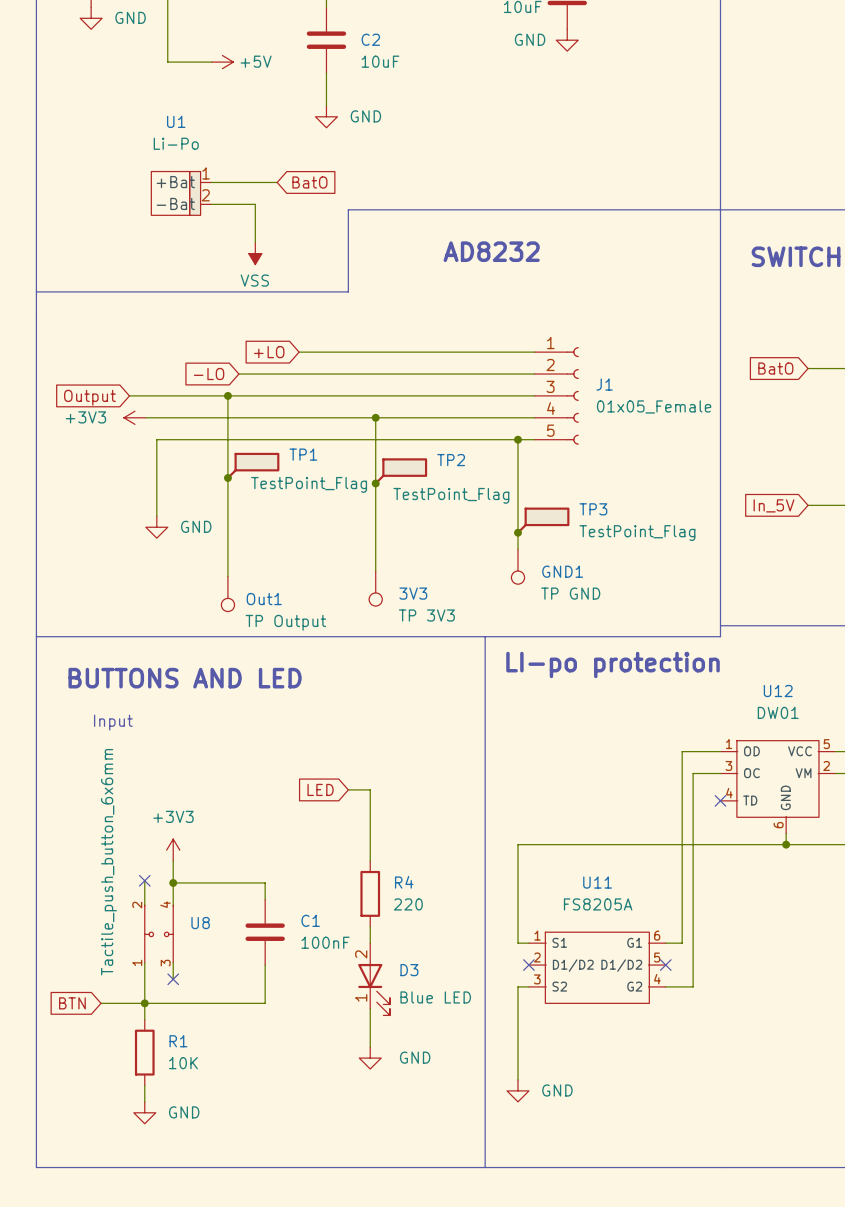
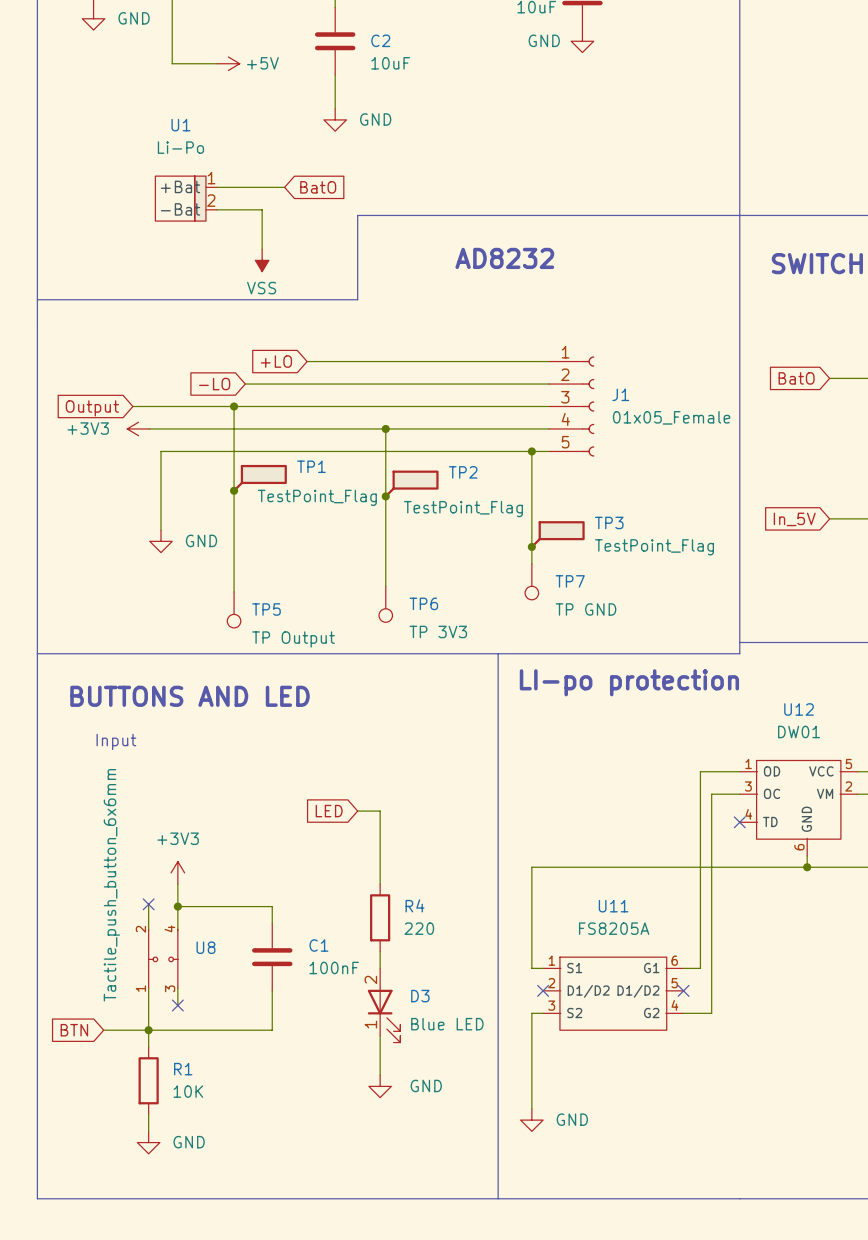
GND1 name: GND1 (562, 571) -> TP7 (570, 581)
3V3 name: 3V3 (413, 593) -> TP6 (423, 603)
Out1 name: Out1 (264, 599) -> TP5 (266, 609)

